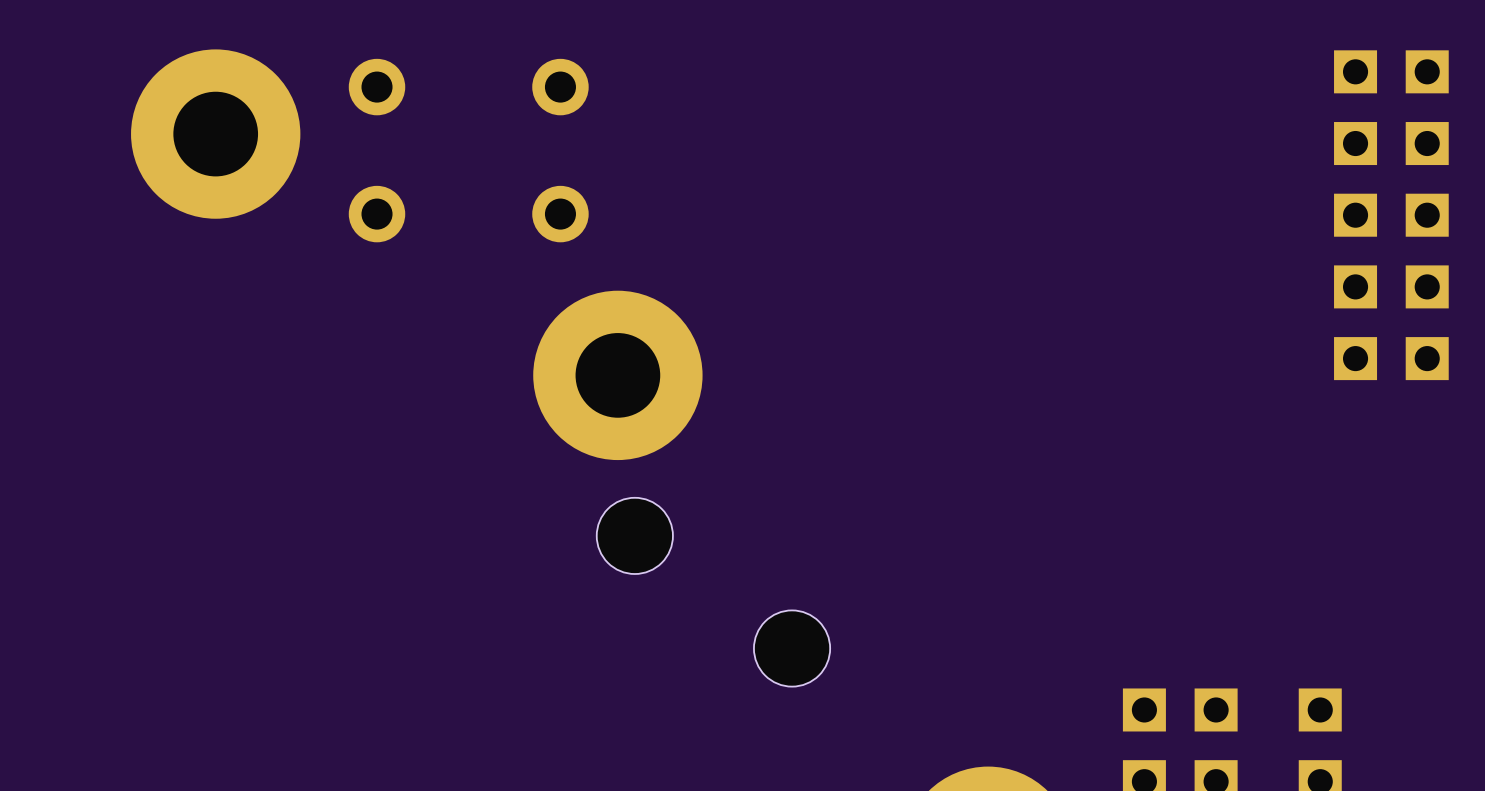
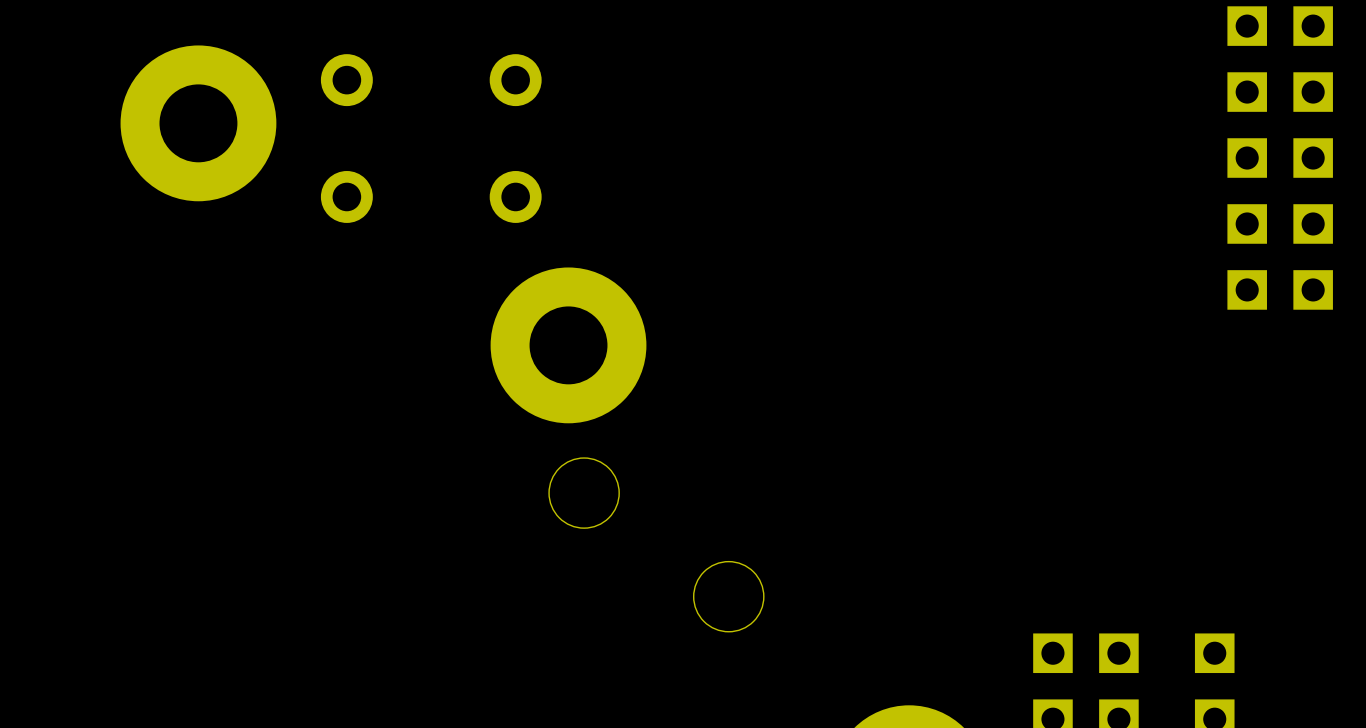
part position: (1391, 215) -> (1280, 158)

